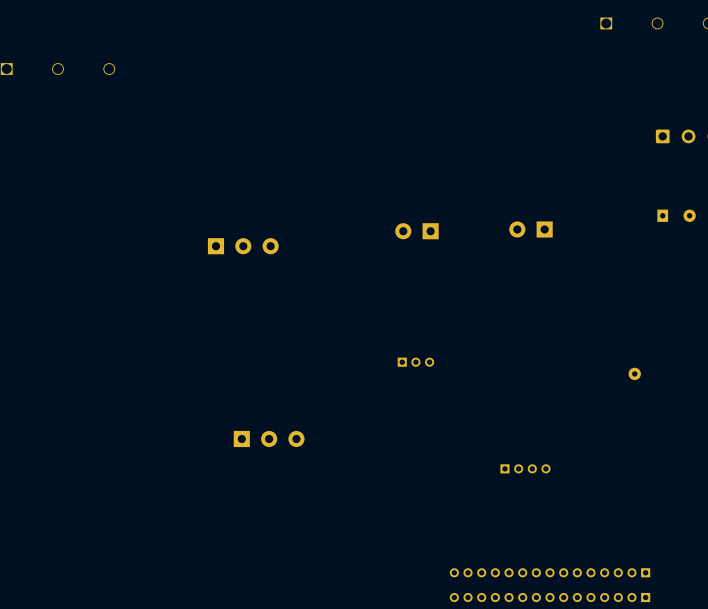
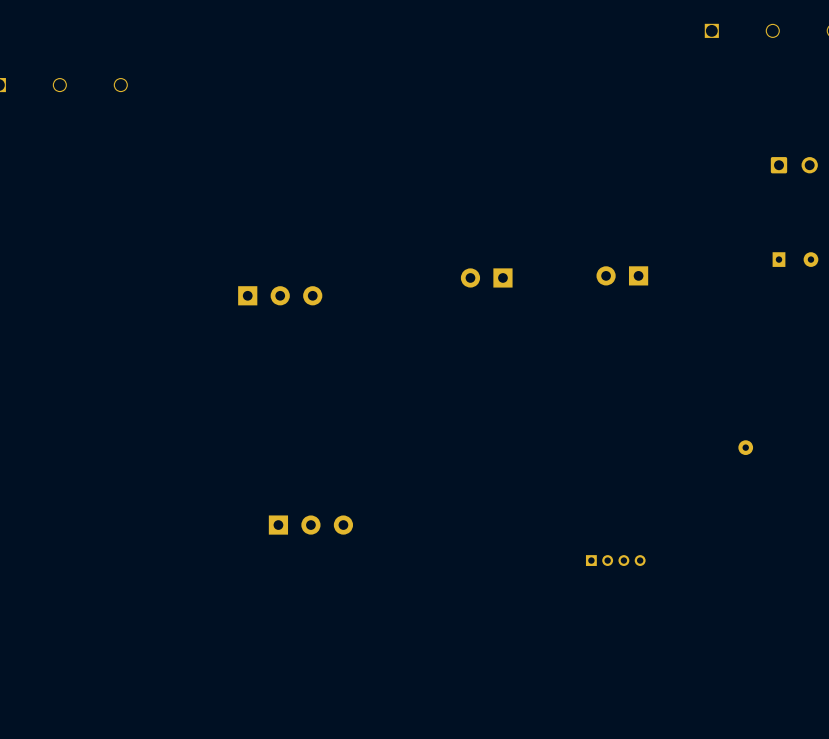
part: (415, 362) -> none
part: (550, 572) -> none
part: (550, 597) -> none

